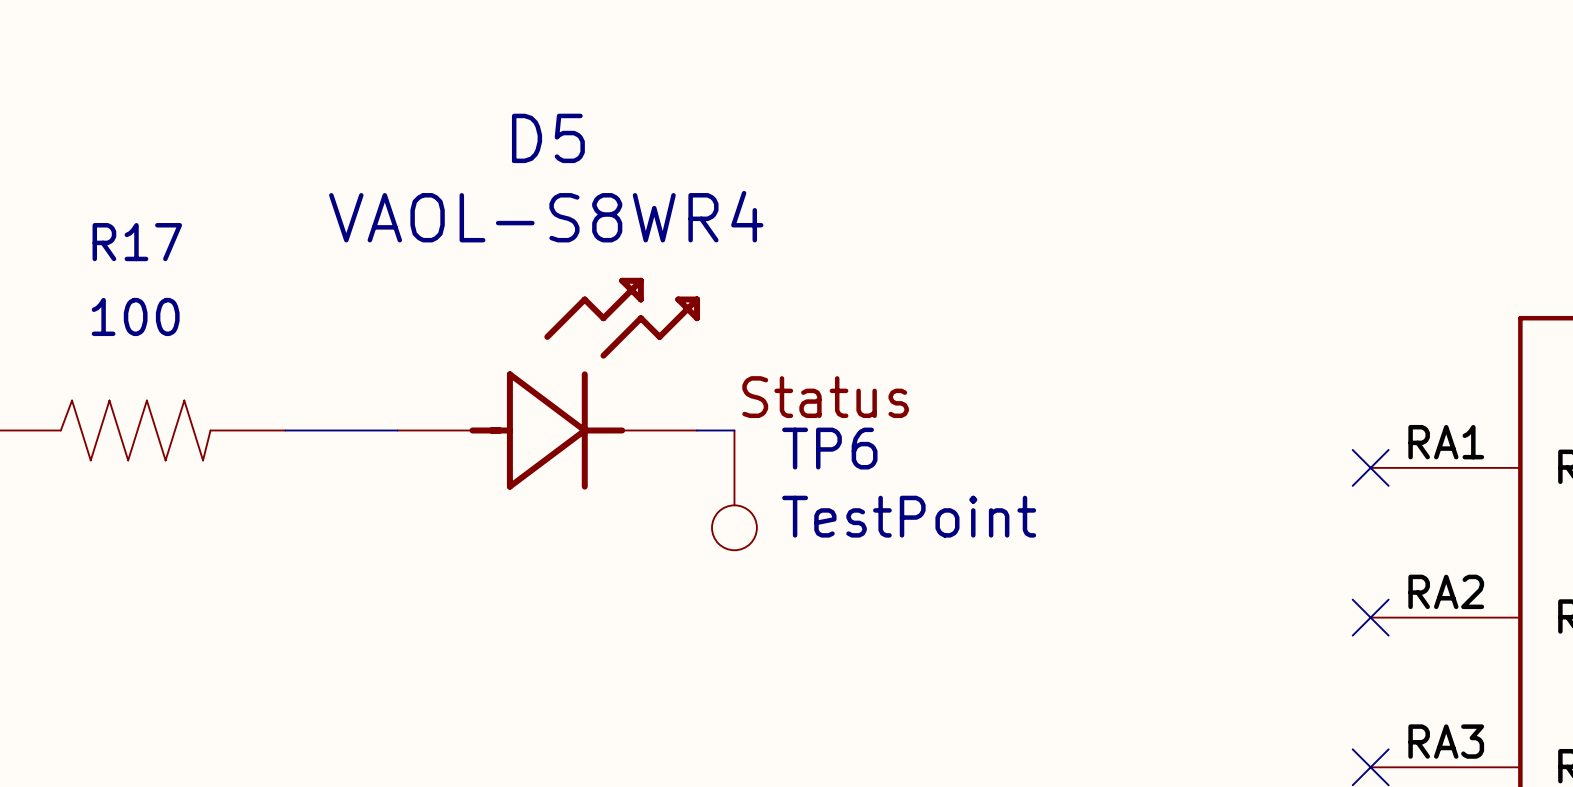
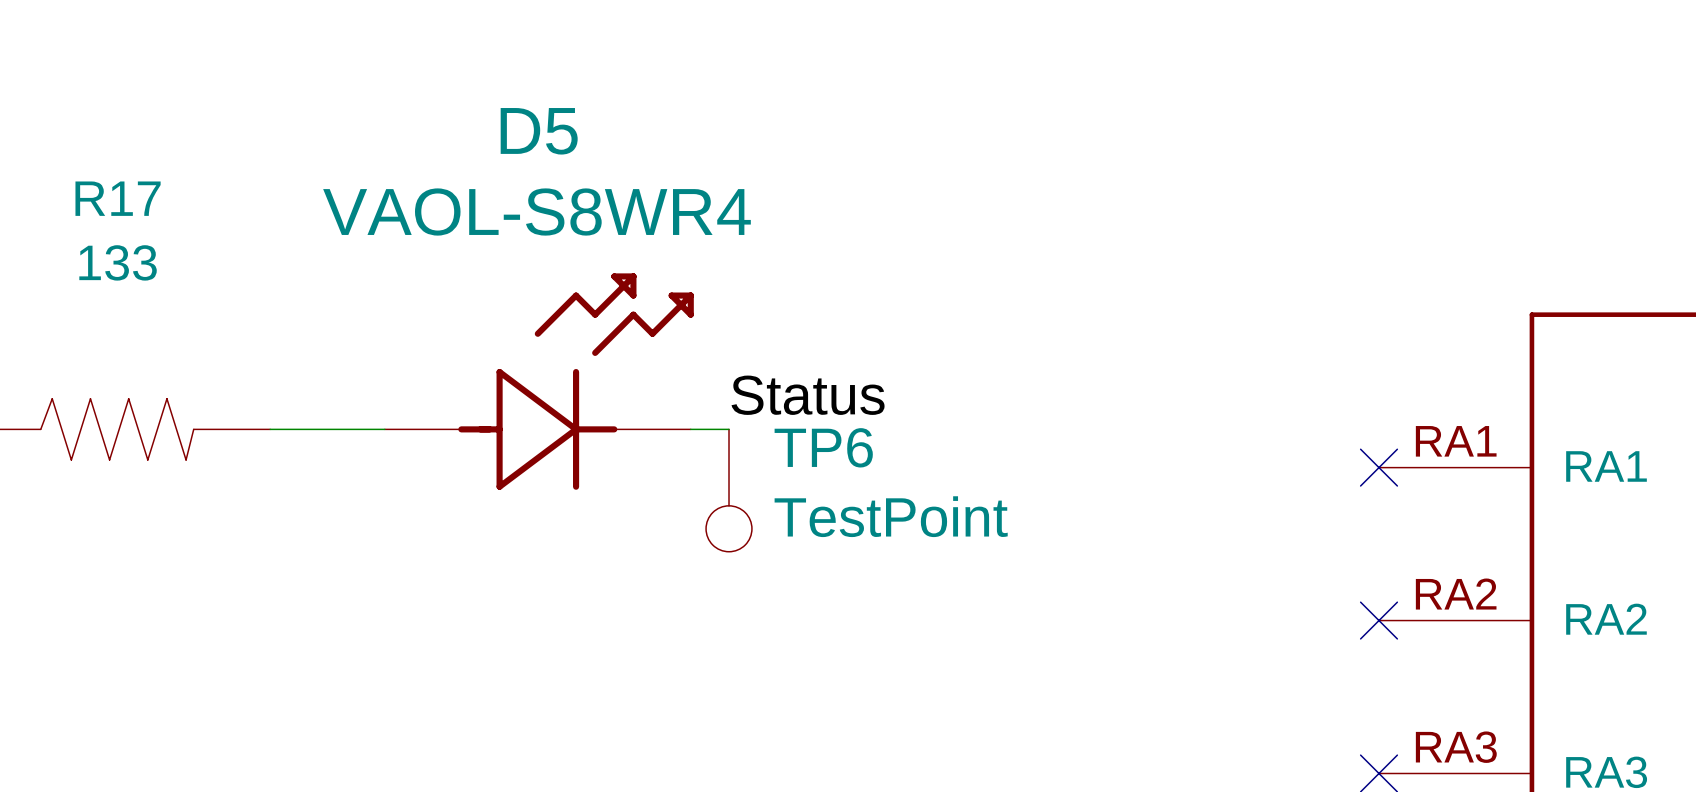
R17 name position: R17 (137, 242) -> R17 (118, 198)
R17 value: 100 (135, 316) -> 133 (118, 262)

